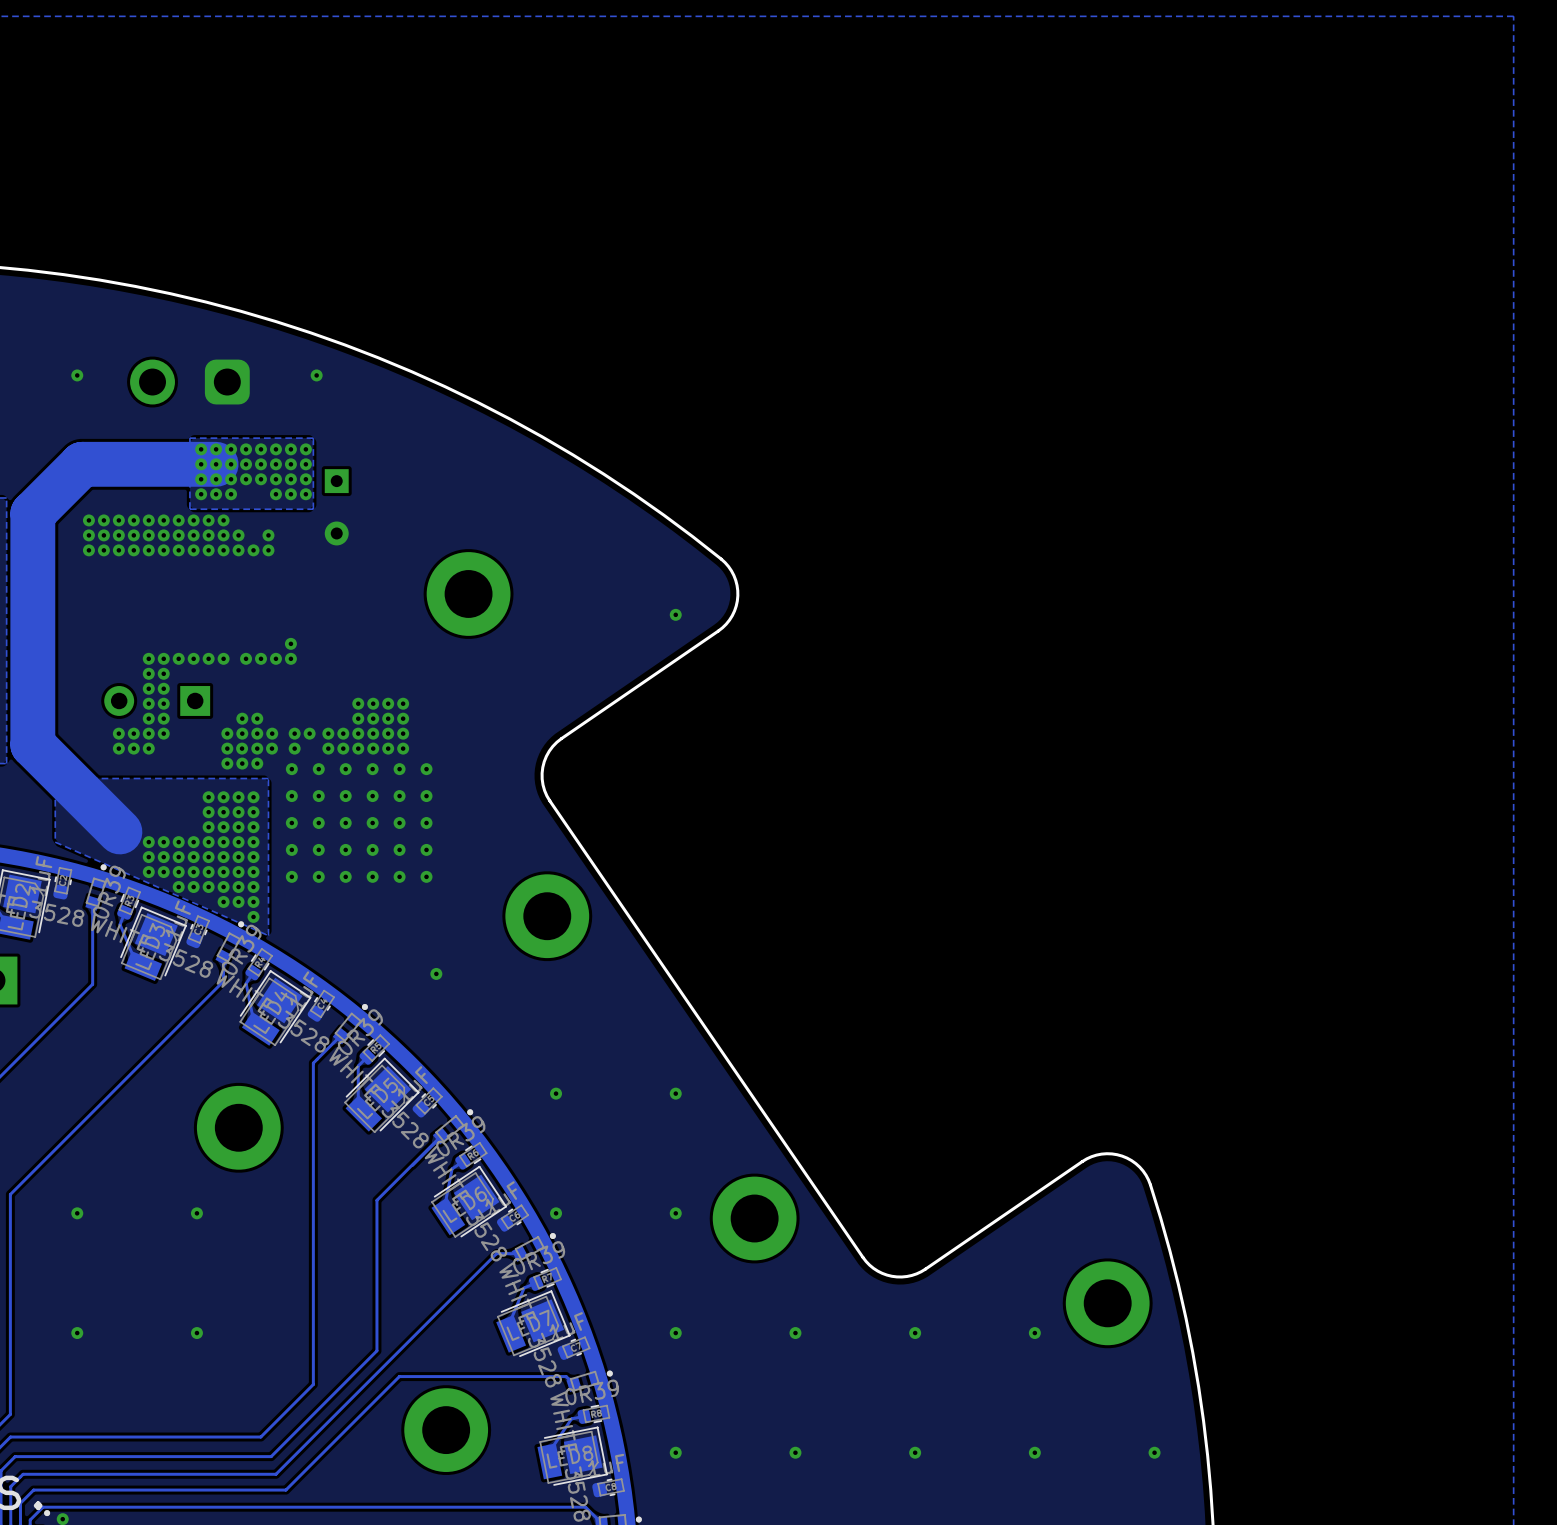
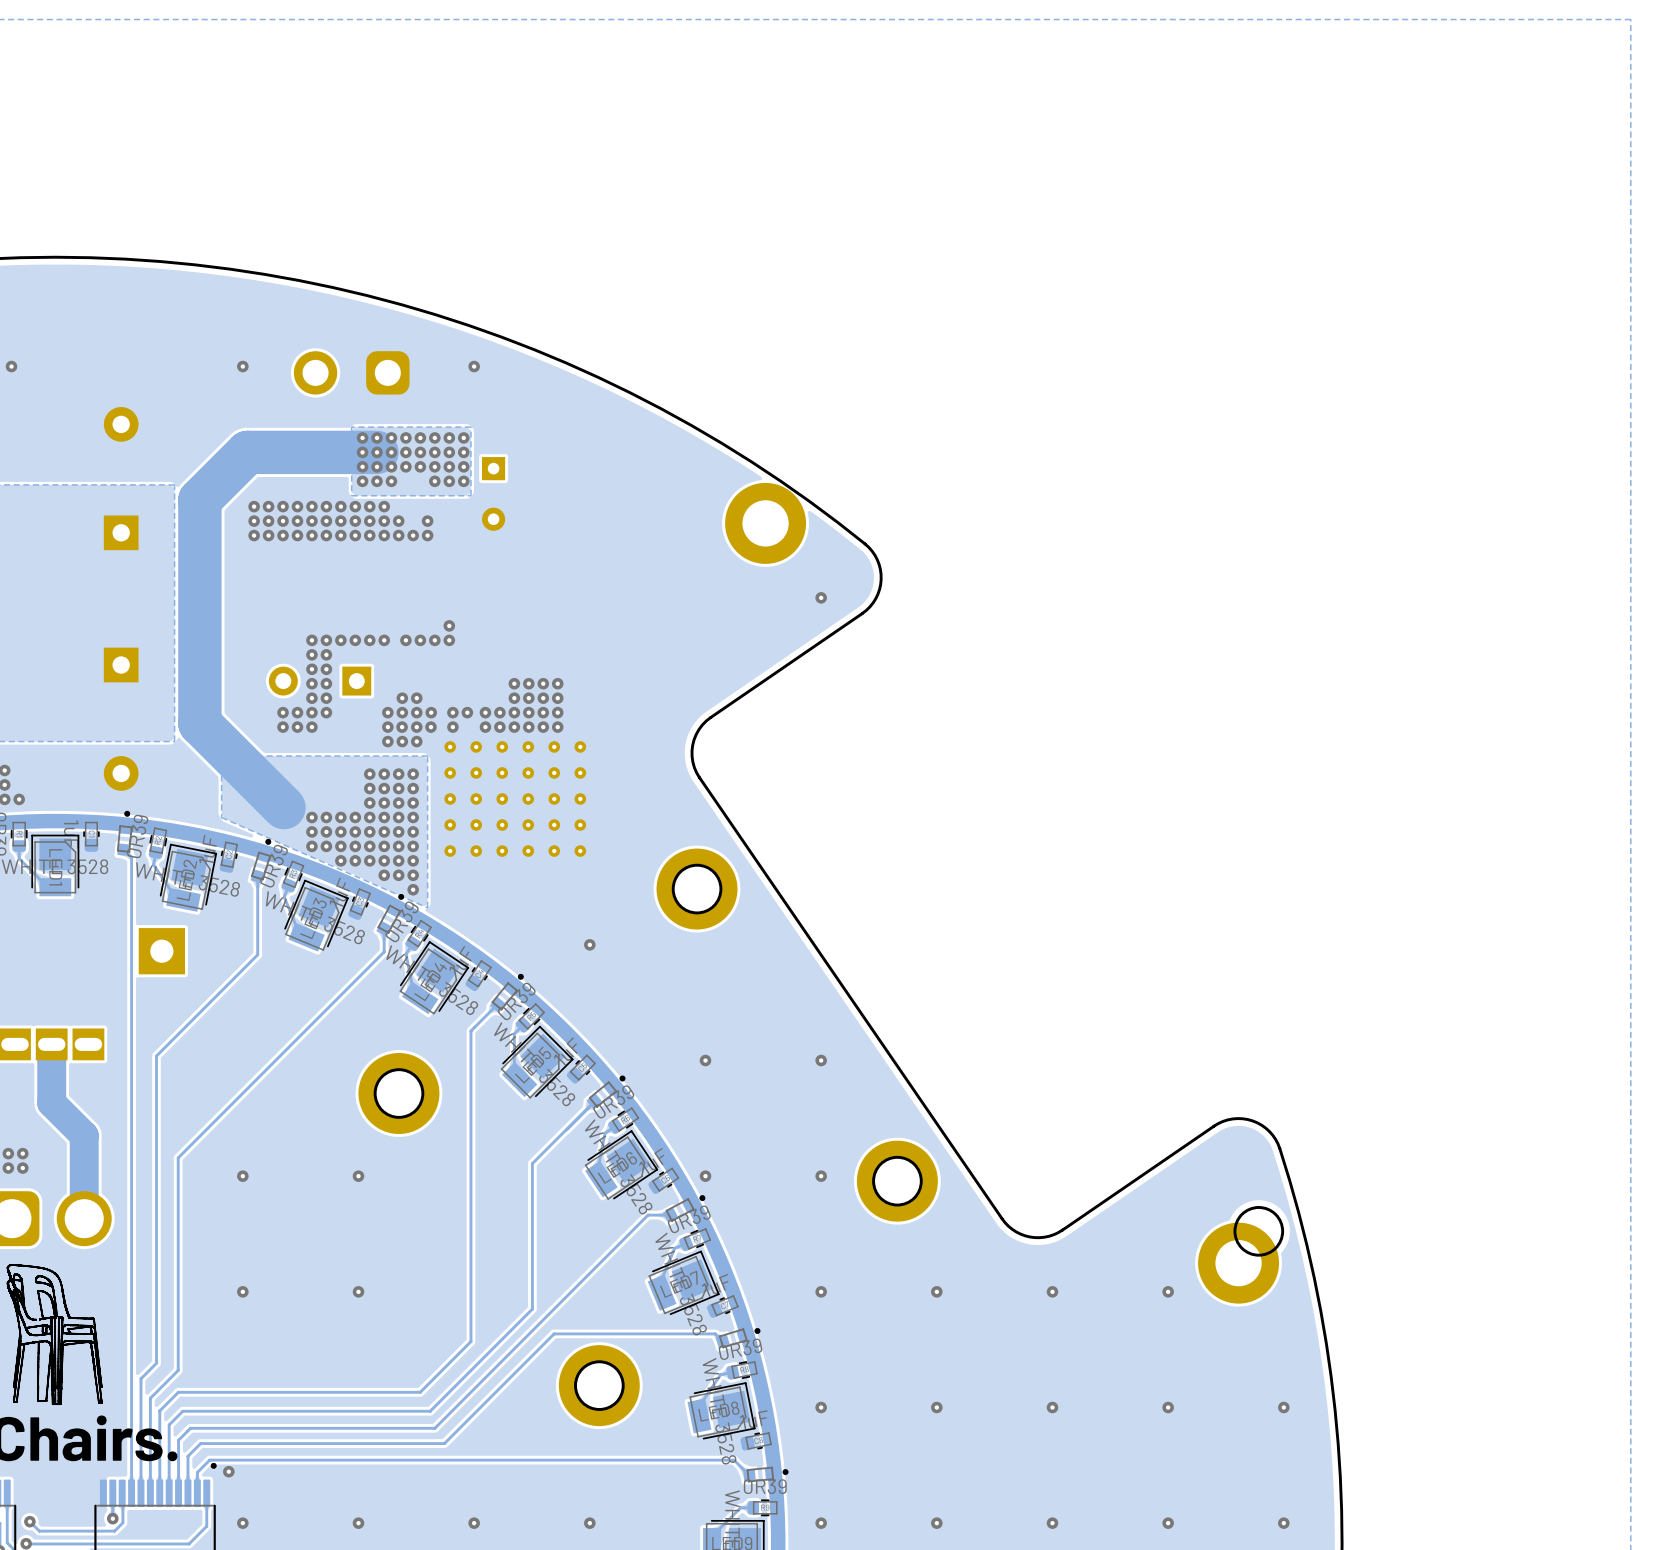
part position: (468, 593) -> (765, 523)
round board edge: none -> [671, 863, 723, 915]
round board edge: none -> [373, 1068, 425, 1119]
round board edge: none -> [872, 1155, 923, 1207]
round board edge: none -> [1233, 1206, 1285, 1257]
round board edge: none -> [574, 1360, 625, 1411]

